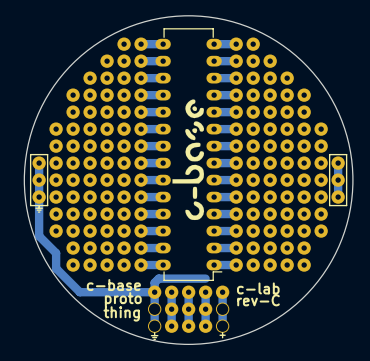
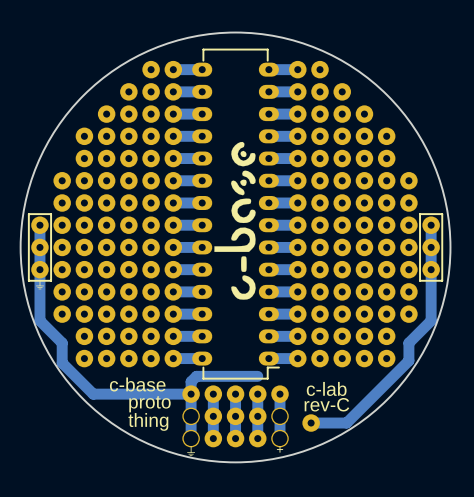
bottom track: none -> (431, 269) (431, 320) (408, 343) (408, 360) (346, 423) (311, 423)
part: none -> (311, 423)

